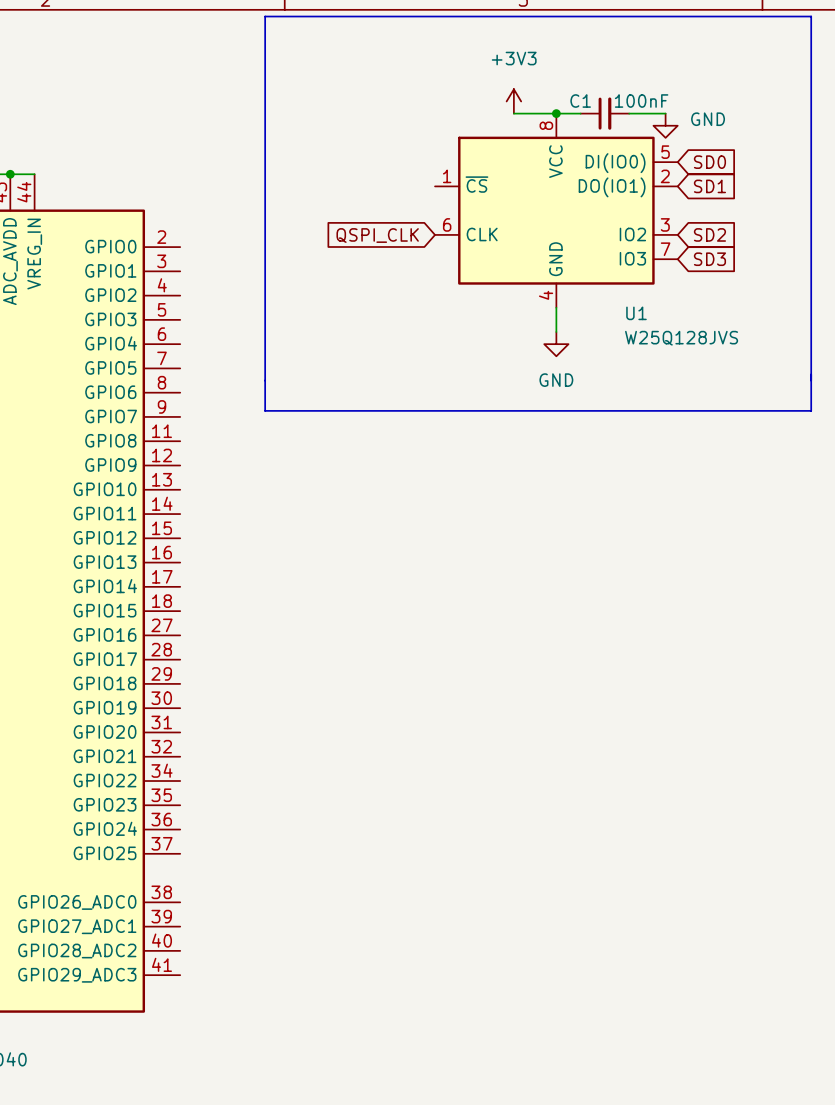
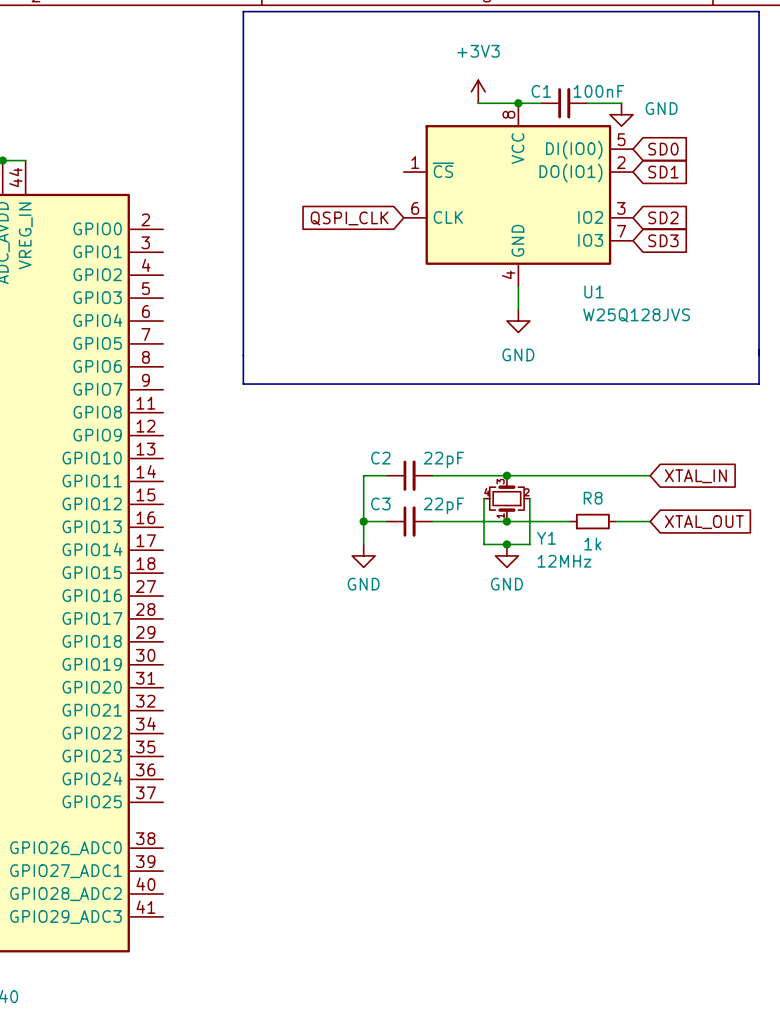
wire: none -> (386, 475) (363, 475) (363, 544)
C2: none -> 22pF (409, 475)
wire: none -> (432, 475) (650, 475)
junction: none -> (506, 475)
global label: none -> XTAL_IN (695, 476)
wire: none -> (484, 498) (484, 544) (529, 544) (529, 498)
Y1: none -> 12MHz (506, 498)
wire: none -> (363, 521) (386, 521)
junction: none -> (363, 521)
C3: none -> 22pF (409, 521)
wire: none -> (432, 521) (569, 521)
junction: none -> (506, 521)
R8: none -> 1k (592, 521)
wire: none -> (615, 521) (650, 521)
global label: none -> XTAL_OUT (704, 522)
junction: none -> (506, 544)
power symbol: none -> GND (363, 555)
power symbol: none -> GND (506, 555)

